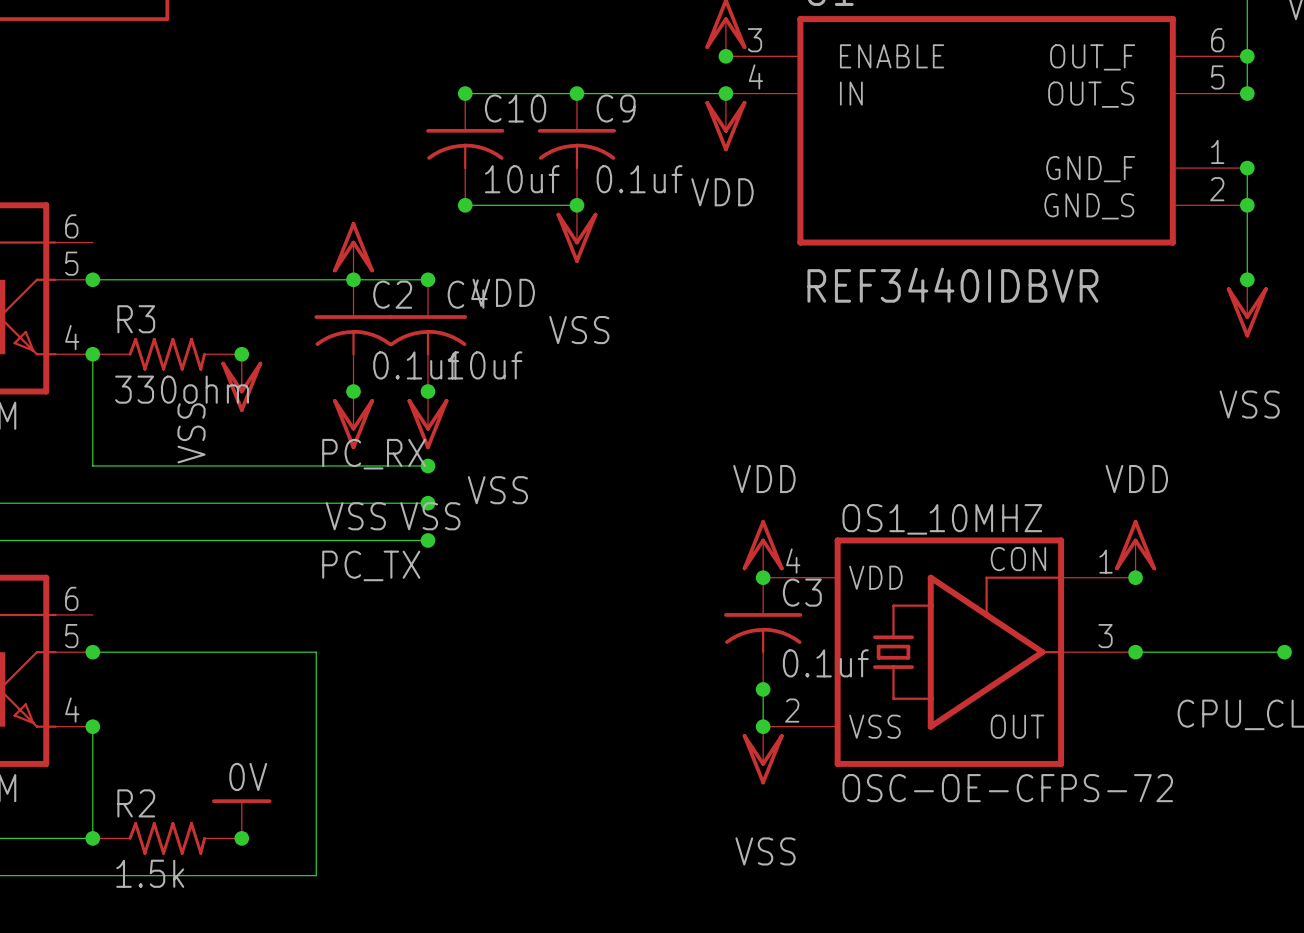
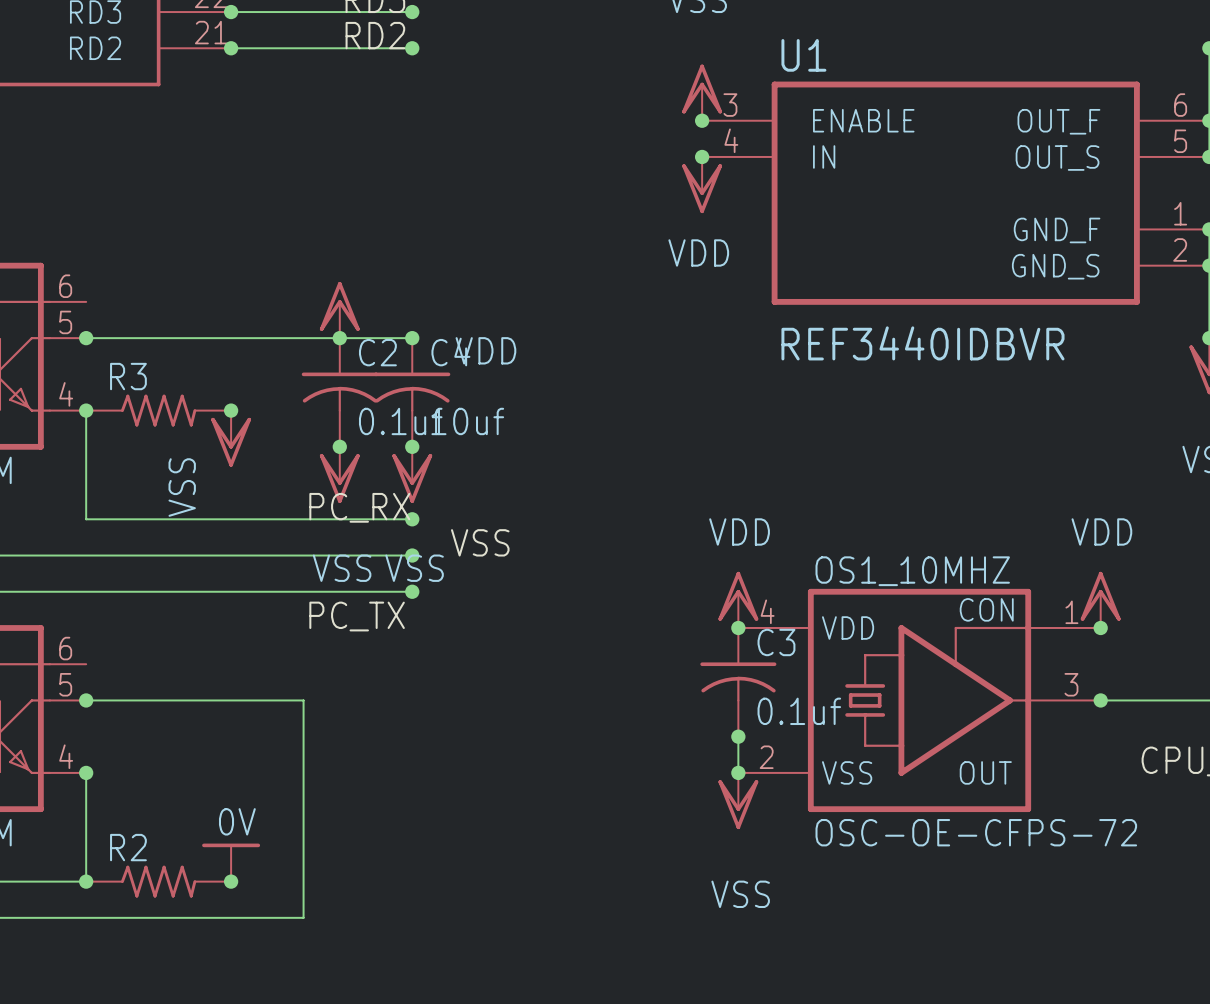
wire: (465, 93) (725, 93) -> none
junction: (465, 93) -> none
junction: (576, 93) -> none
C10: 10uf (465, 149) -> none
C9: 0.1uf (576, 149) -> none
wire: (465, 205) (576, 205) -> none
junction: (465, 205) -> none
junction: (576, 205) -> none
power symbol: VSS (576, 234) -> none
R3 value: 330ohm (182, 389) -> none
R2 value: 1.5k (150, 873) -> none

